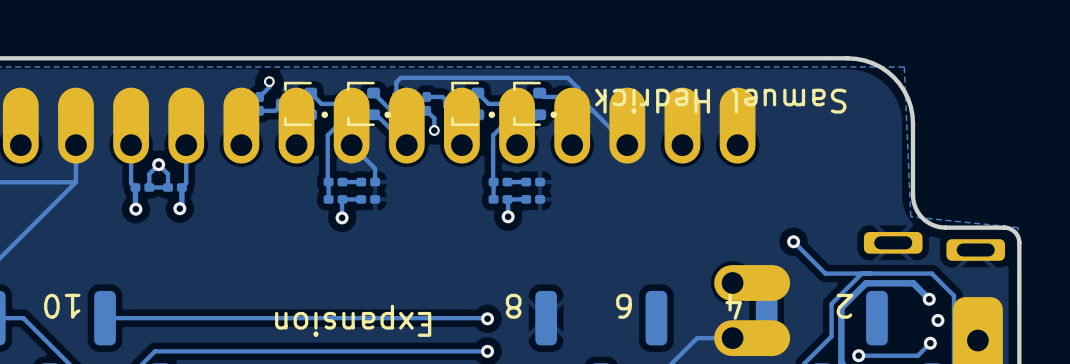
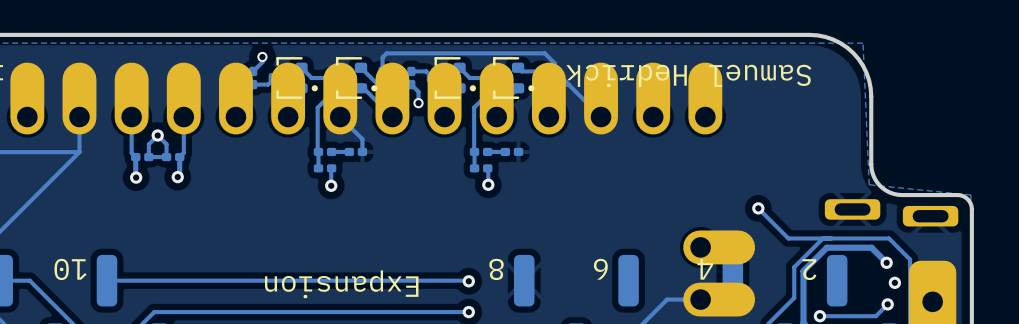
track: (361, 199) (342, 199) -> none
part: (368, 199) -> none
track: (526, 199) (507, 199) -> none
part: (533, 199) -> none

